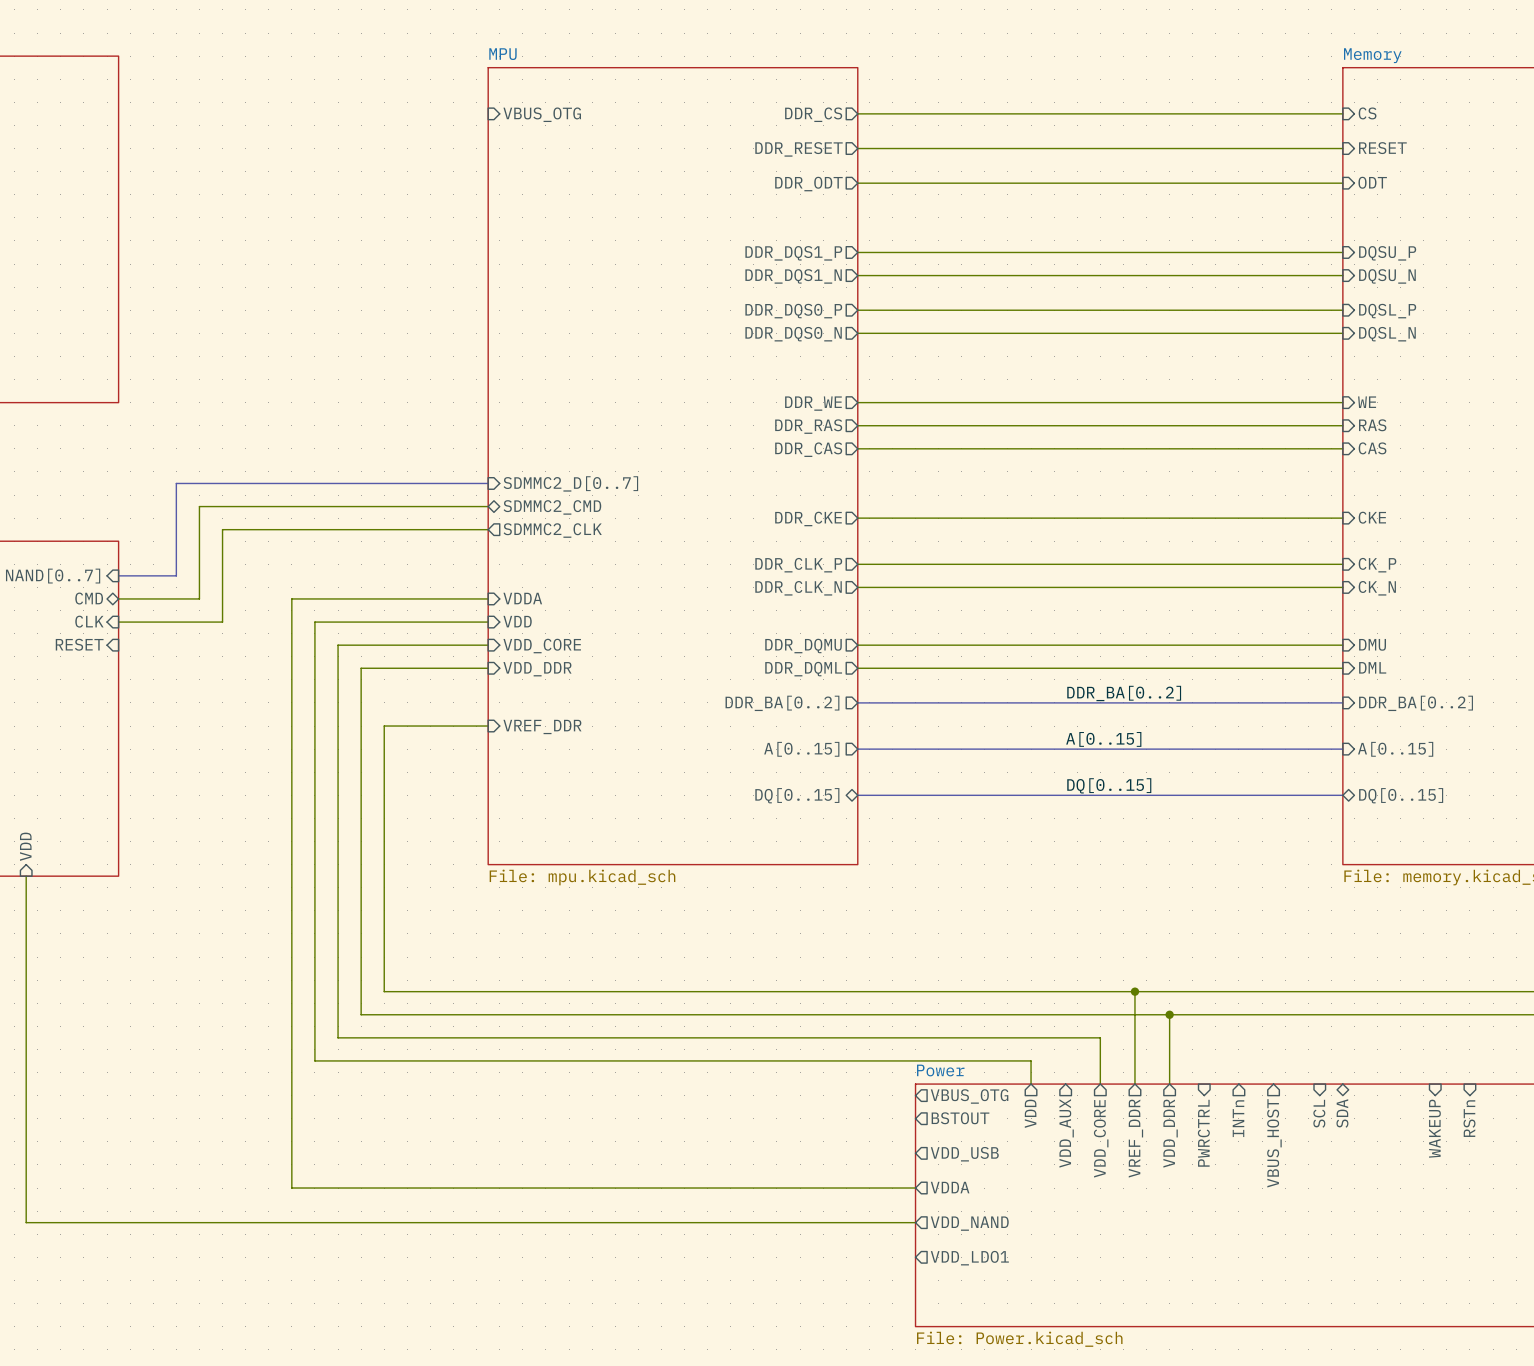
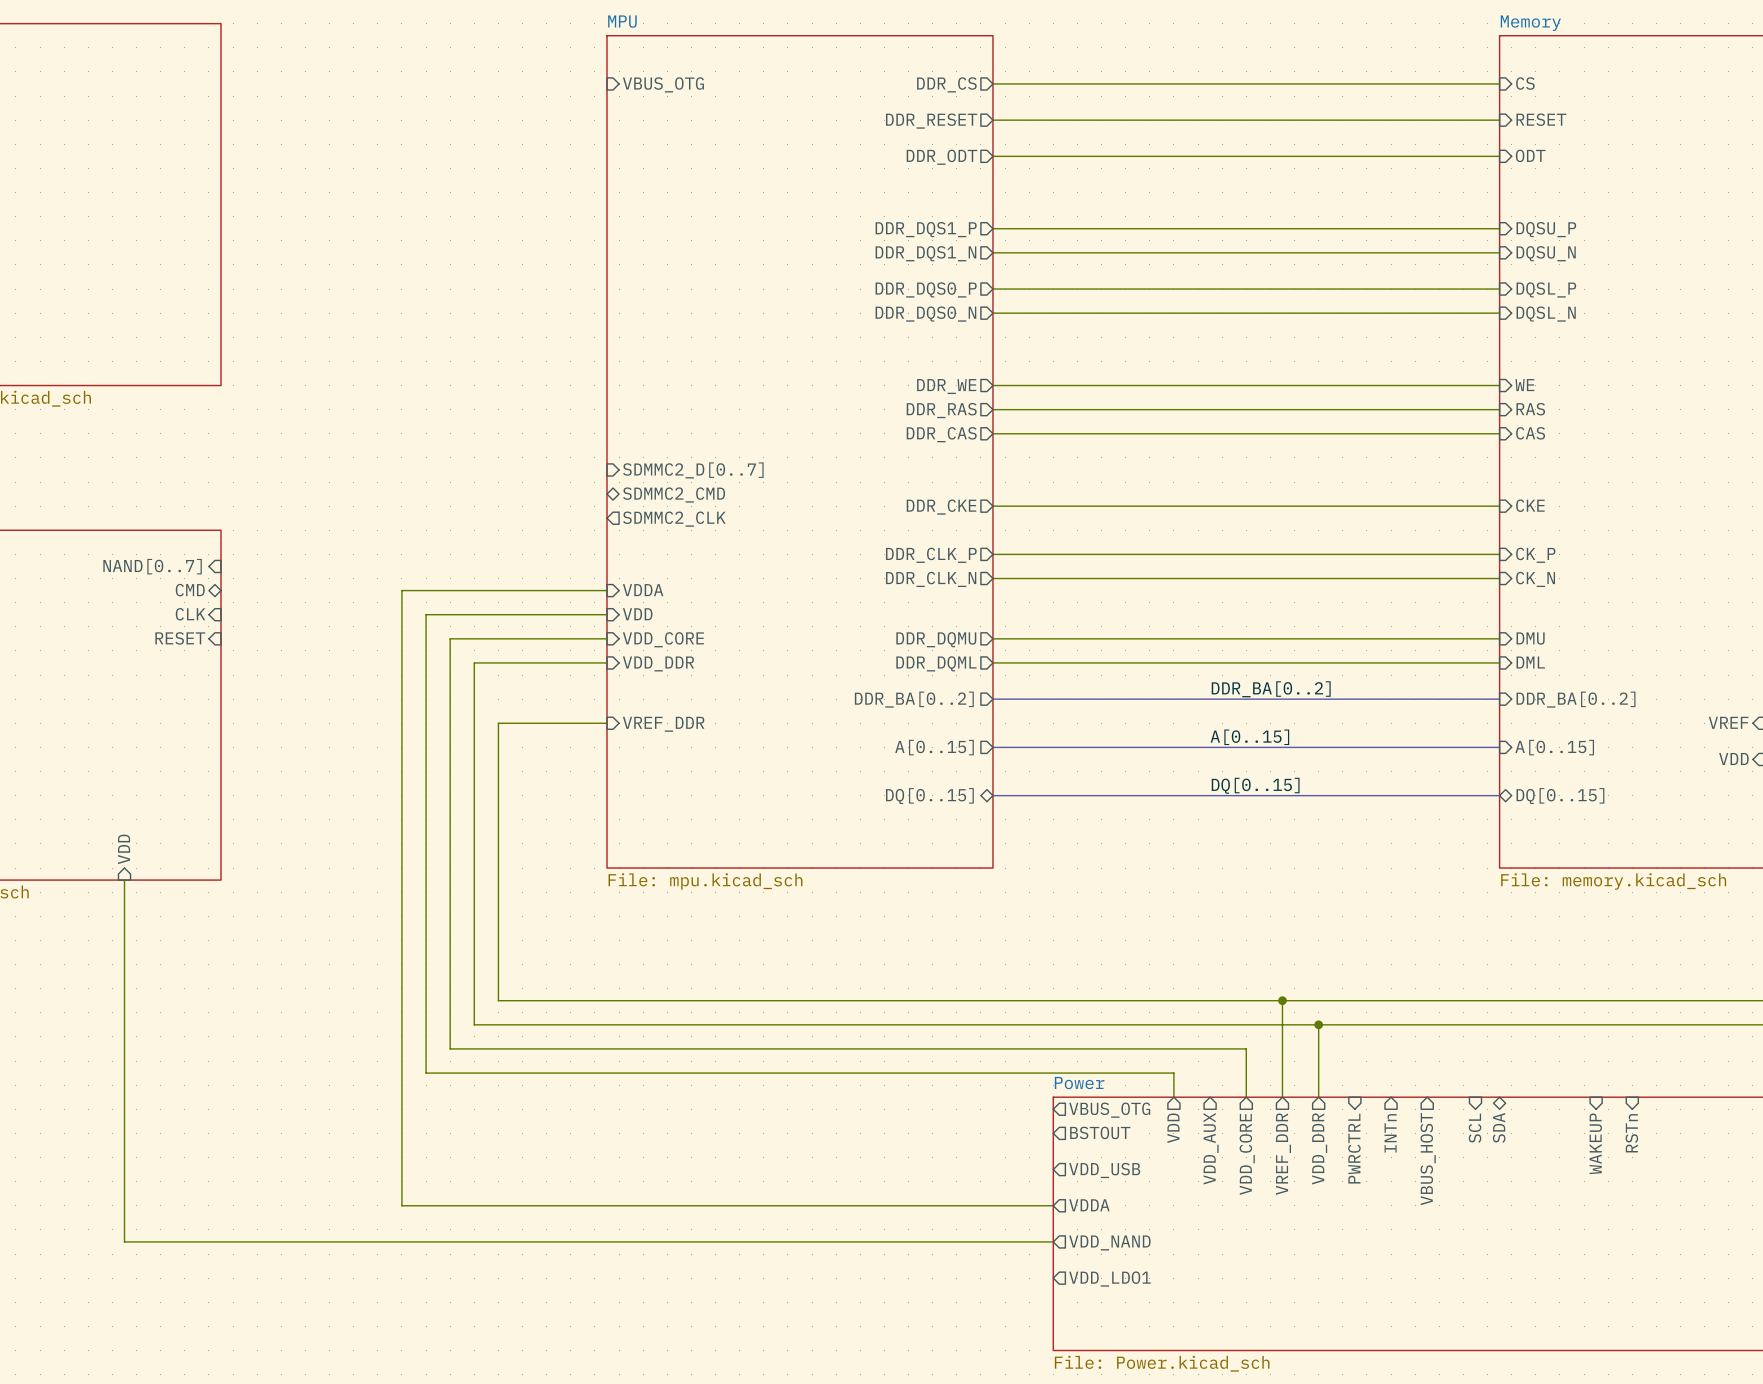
bus: (488, 483) (176, 483) (176, 575) (118, 575) -> none
wire: (488, 506) (199, 506) (199, 598) (118, 598) -> none
wire: (488, 529) (222, 529) (222, 622) (118, 622) -> none

